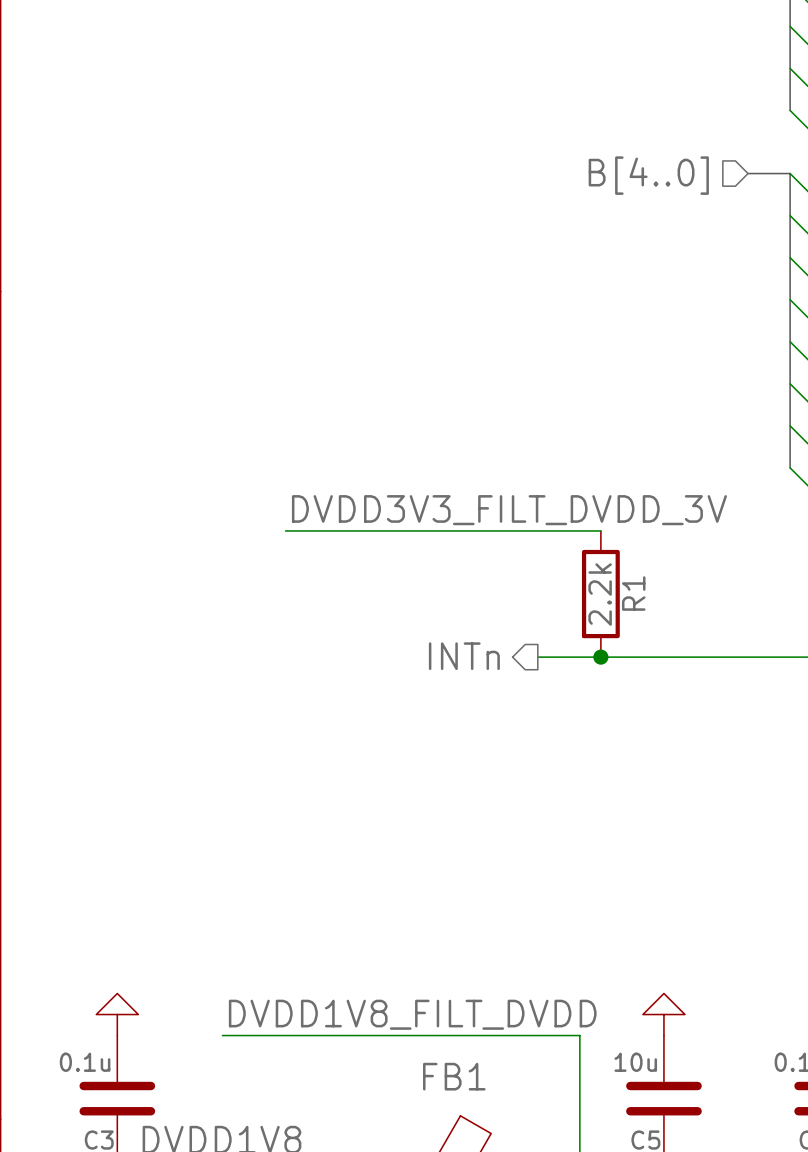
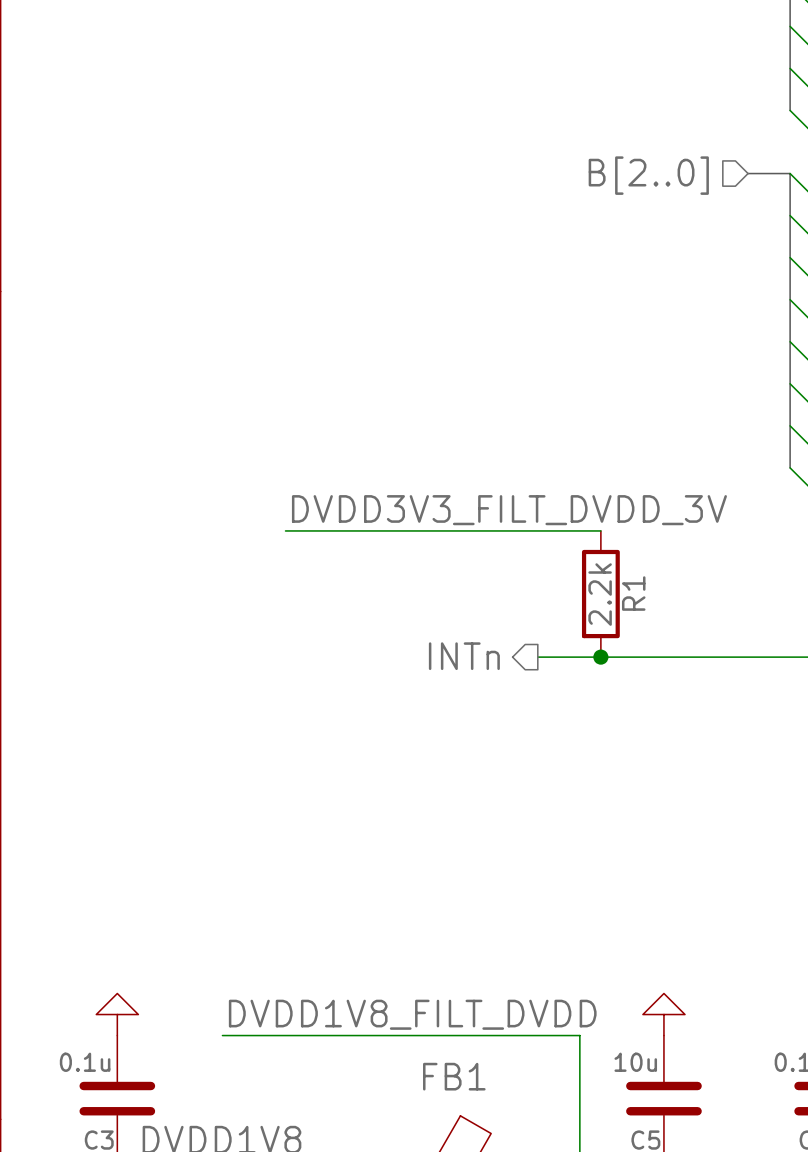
hierarchical label: B[4..0] (648, 175) -> B[2..0] (648, 175)

